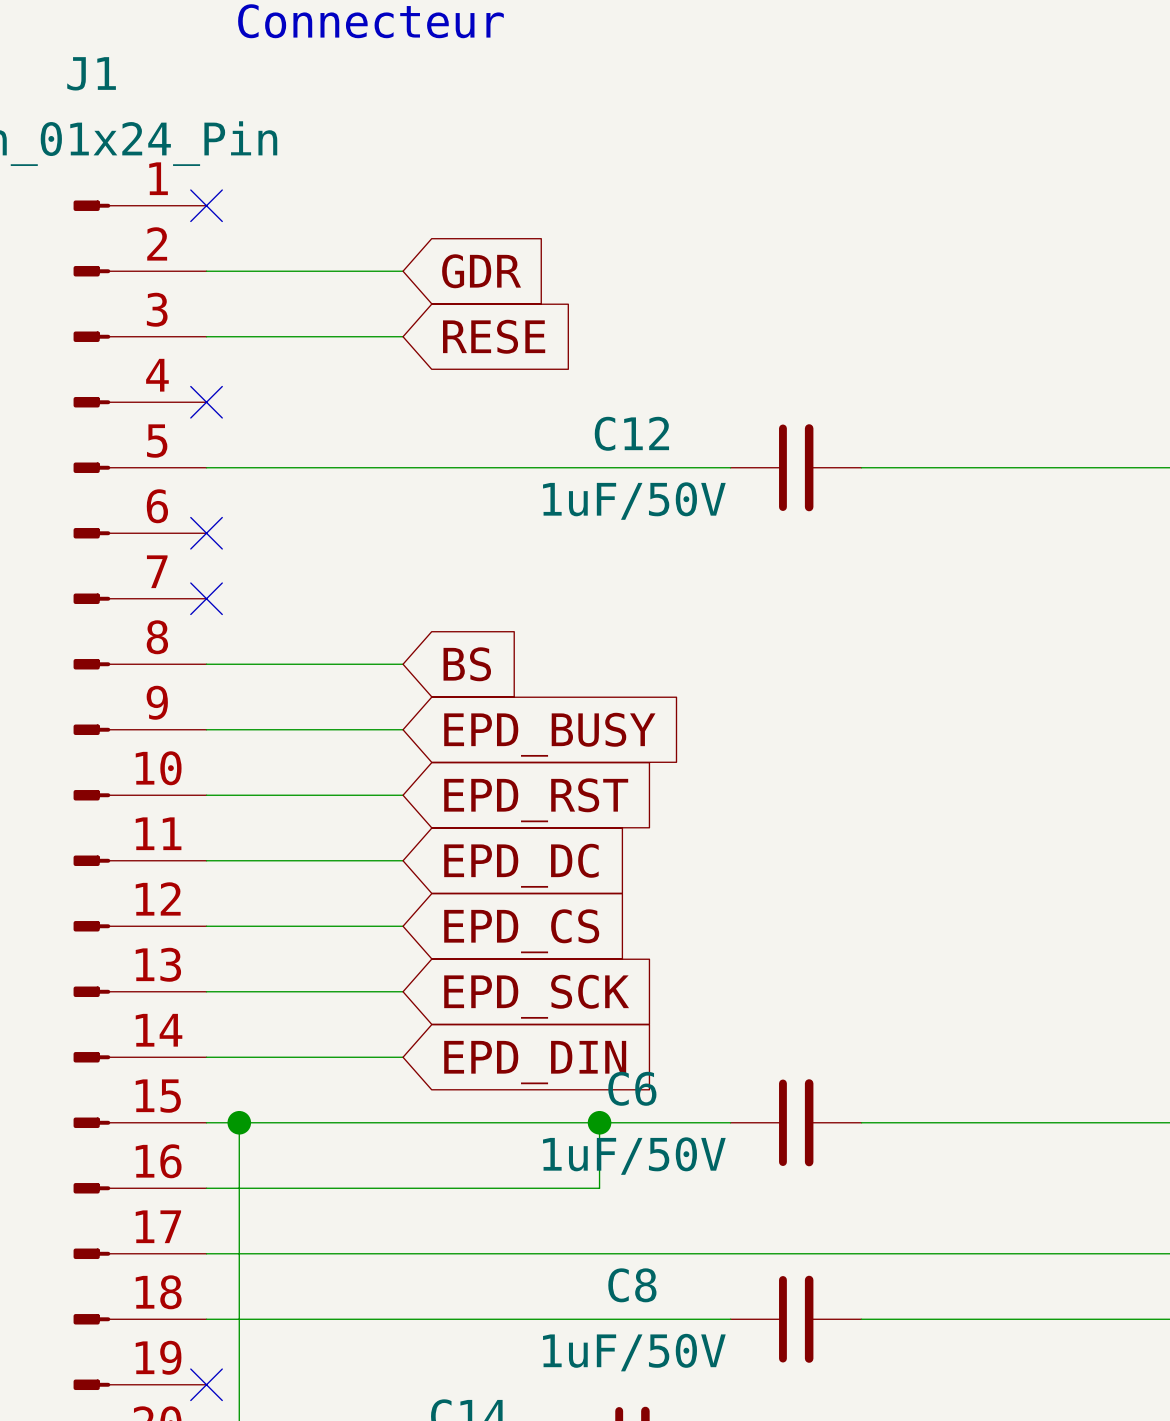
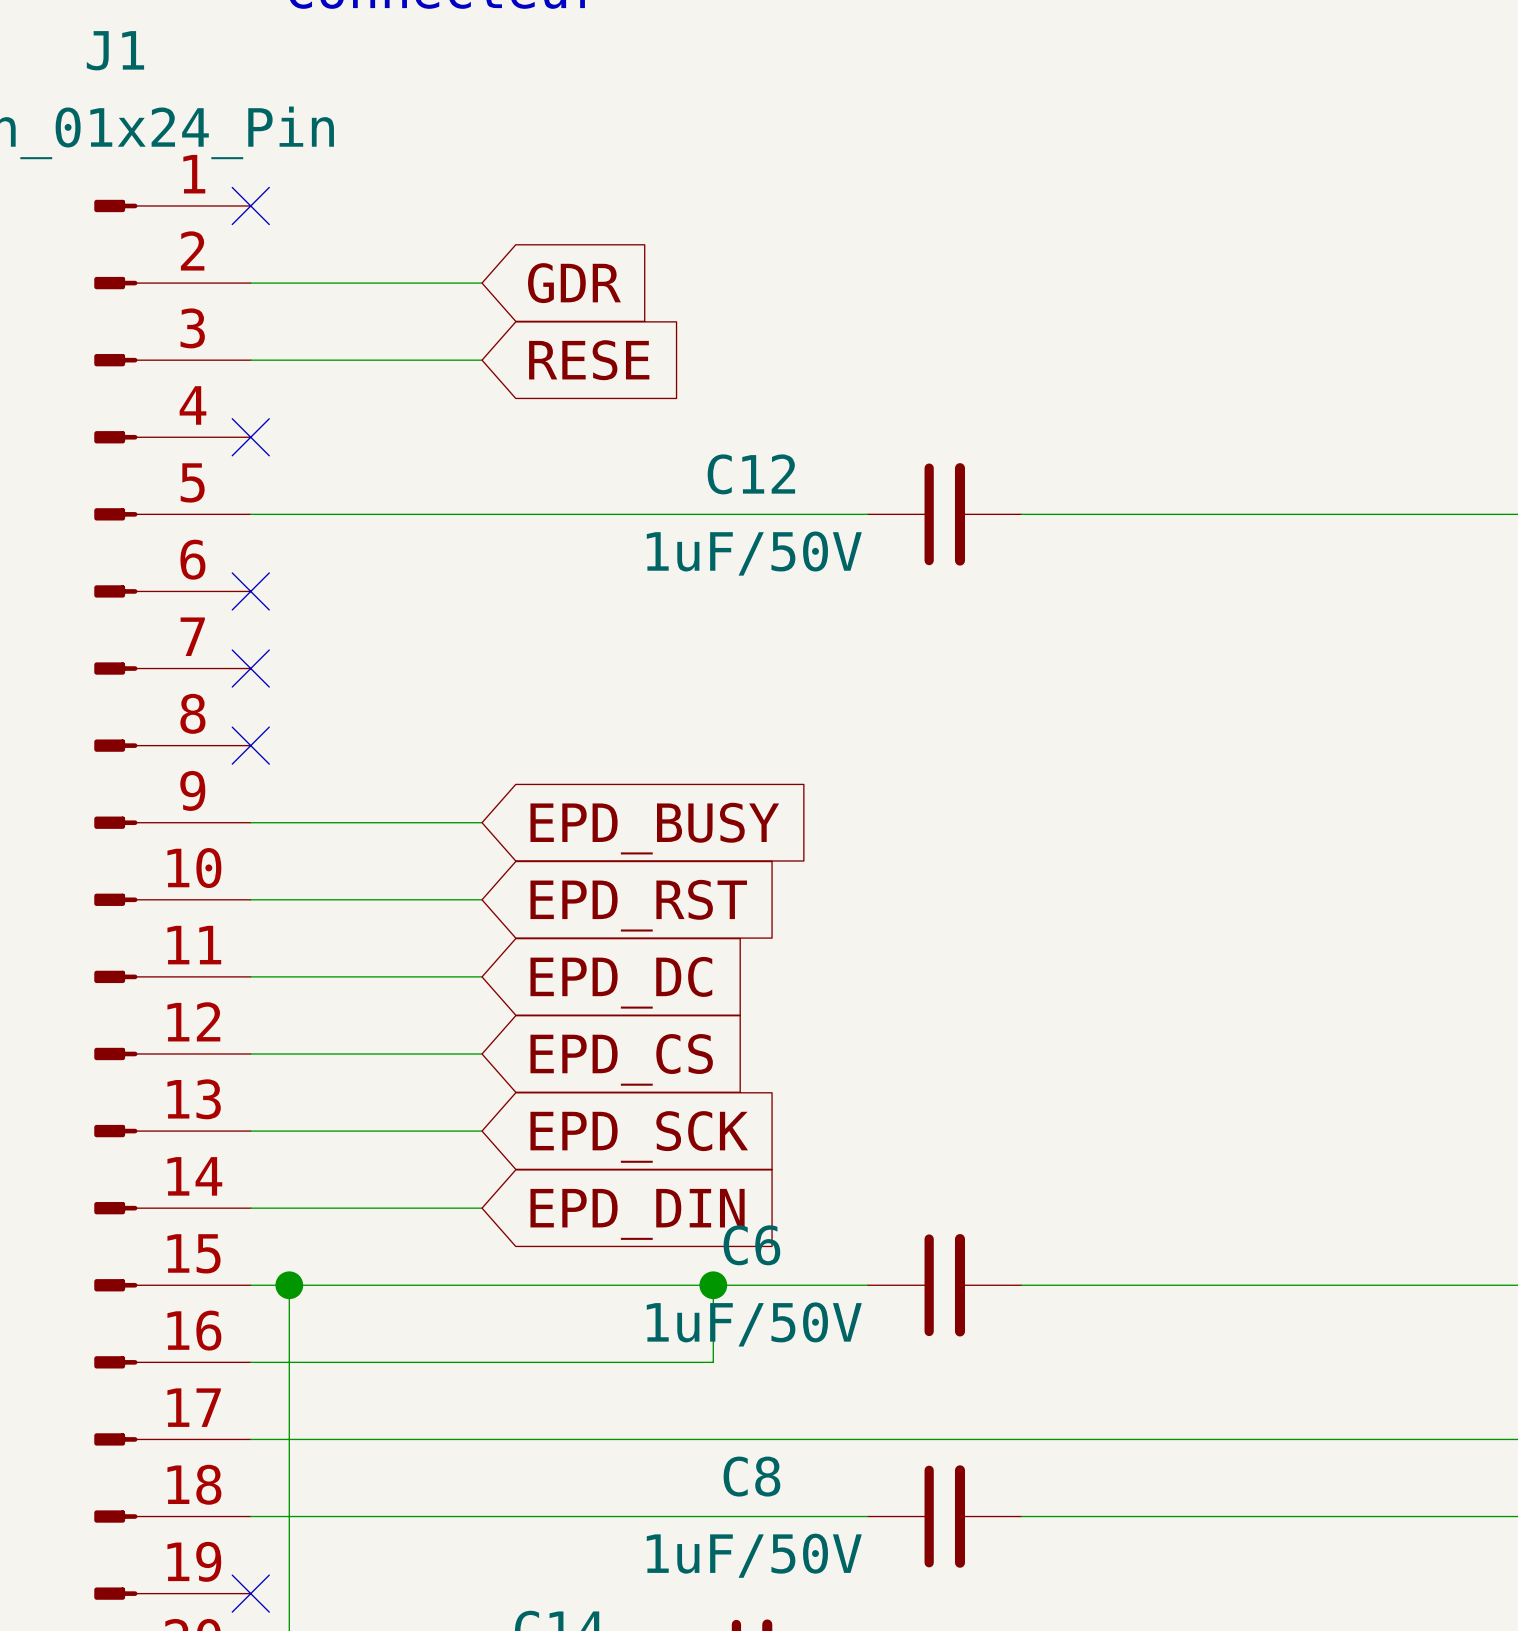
wire: (206, 664) (403, 664) -> none
no-connect mark: none -> (250, 745)
global label: BS (467, 664) -> none

